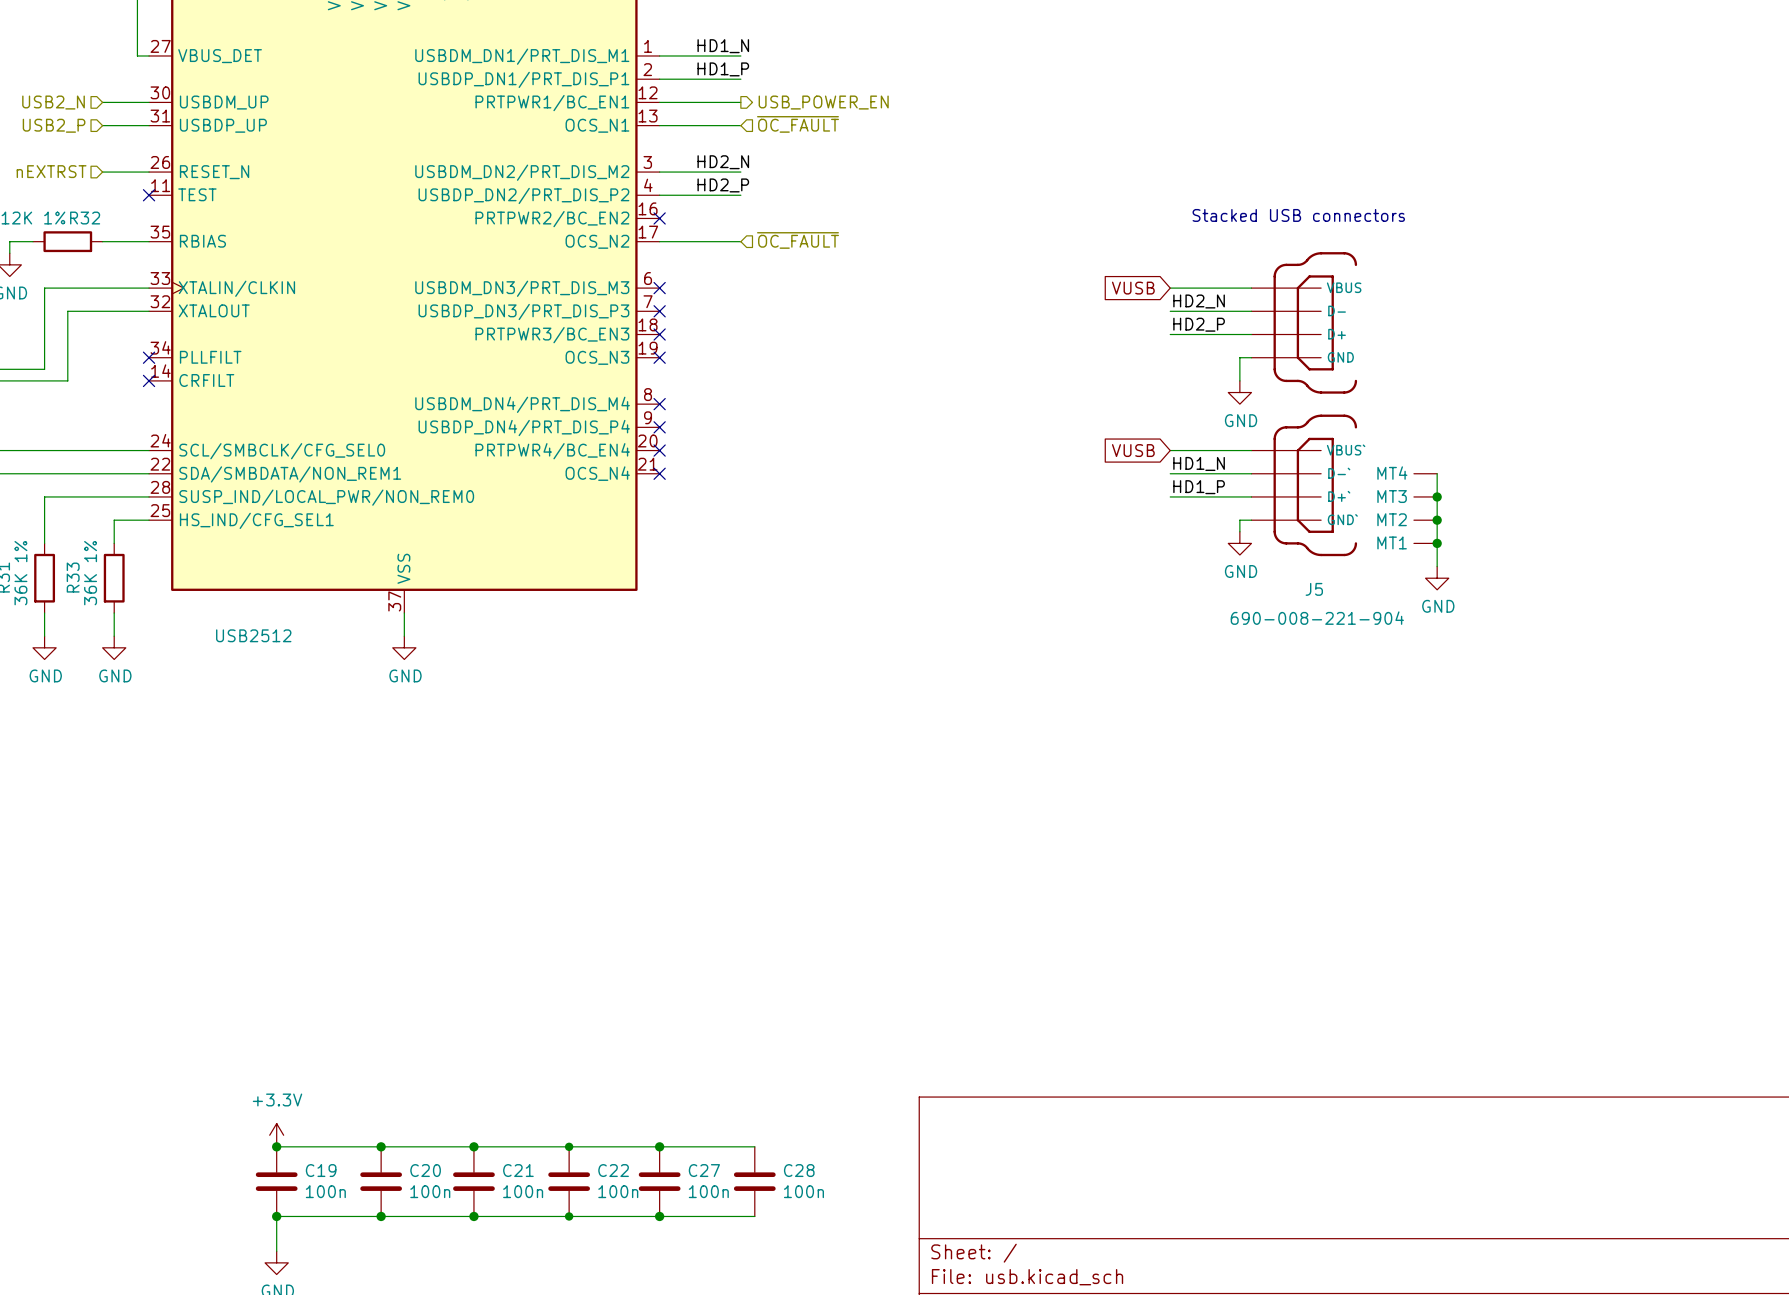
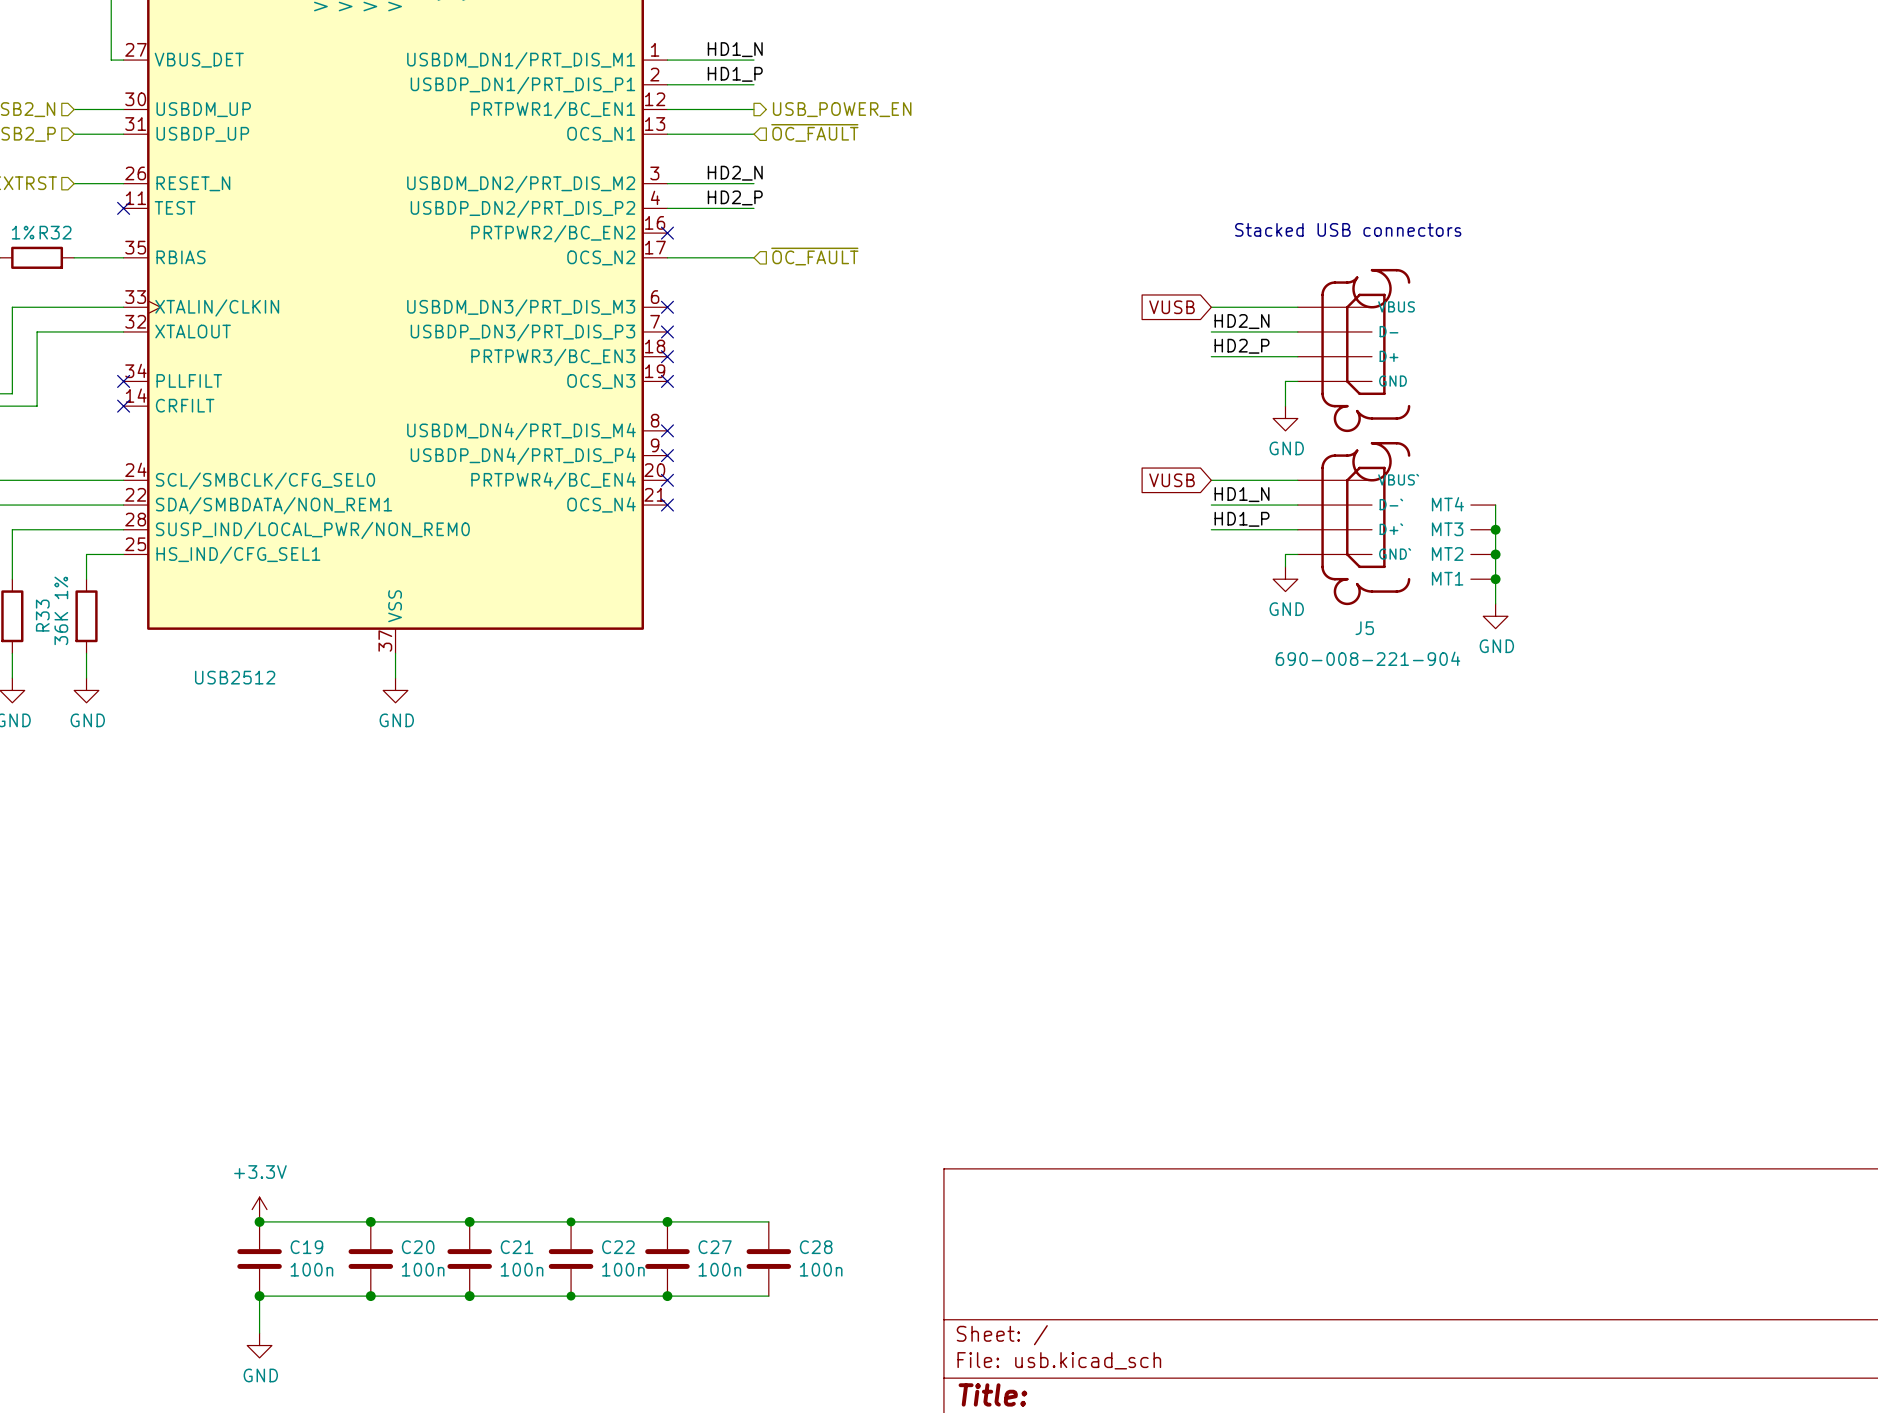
J5 symbol: [1251, 252, 1438, 557] -> [1297, 268, 1496, 606]

